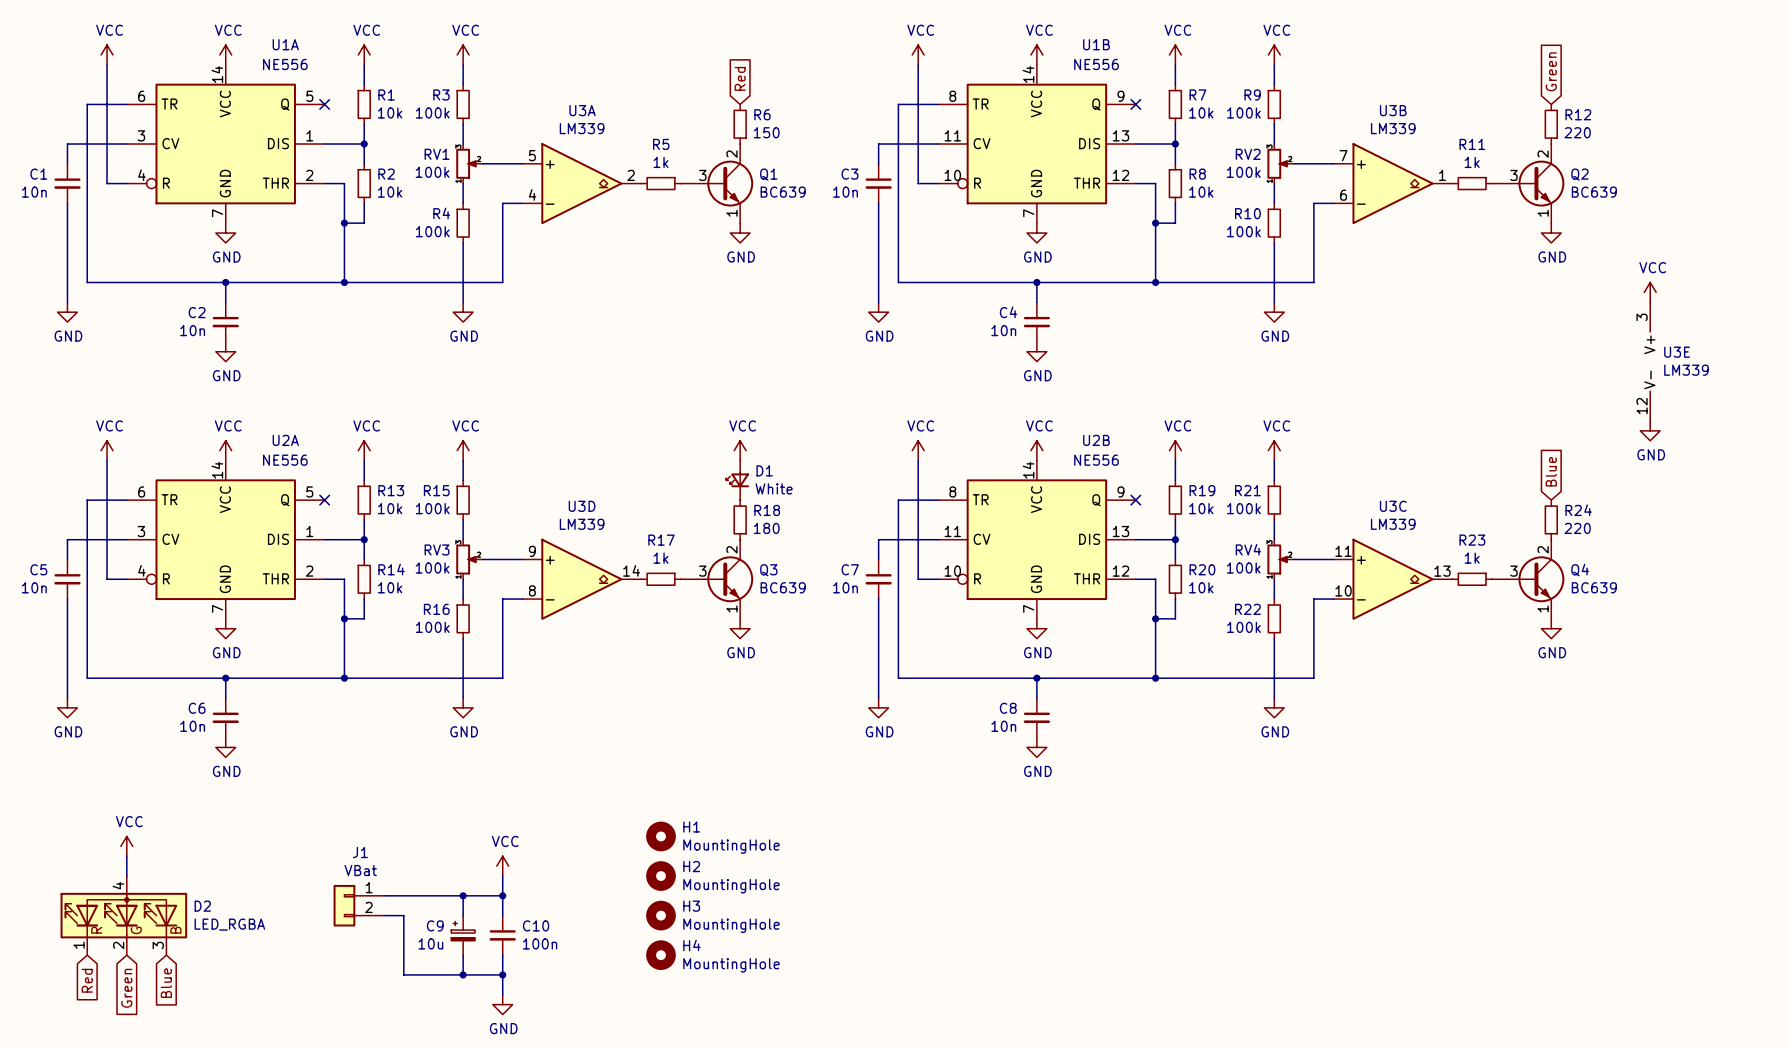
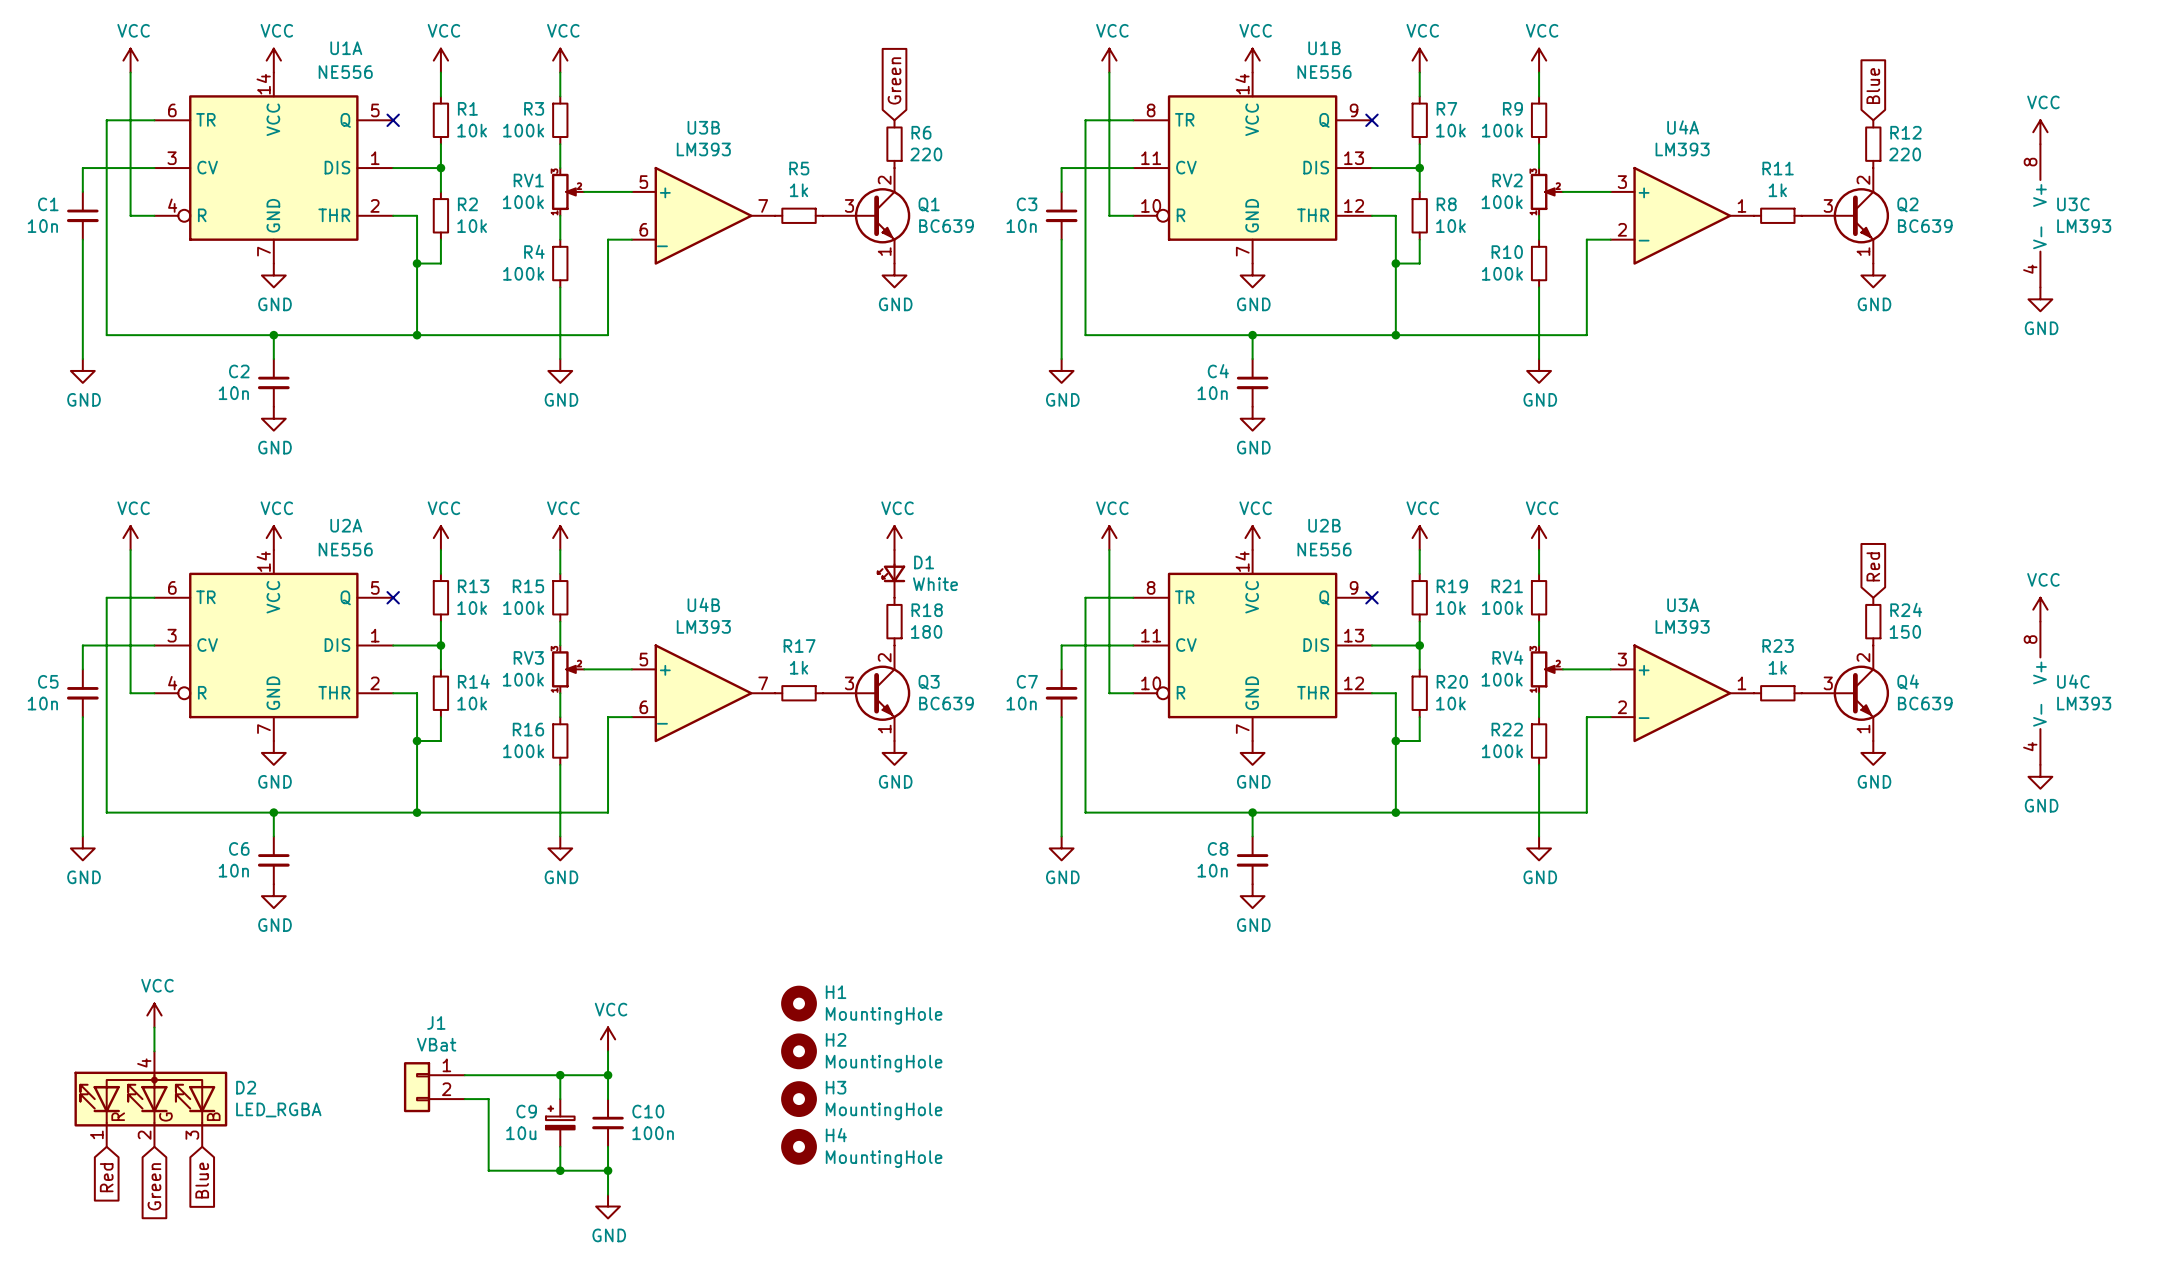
global label: Green (1551, 71) -> Blue (1873, 86)
global label: Red (740, 78) -> Green (894, 80)
power symbol: none -> VCC (2040, 132)
U3A value: LM339 (582, 128) -> LM393 (1682, 626)
U3B value: LM339 (1393, 128) -> LM393 (703, 149)
R6 value: 150 (766, 132) -> 220 (926, 154)
U3A symbol: [522, 143, 642, 225] -> [1610, 644, 1754, 743]
U3B symbol: [1333, 143, 1453, 225] -> [631, 166, 776, 265]
U4A: none -> LM393 (1682, 215)
power symbol: none -> GND (2040, 299)
power symbol: VCC (1650, 292) -> none
U3E: LM339 (1650, 361) -> none
power symbol: GND (1650, 430) -> none
global label: Blue (1551, 471) -> Red (1873, 566)
U3C name position: U3C (1393, 506) -> U3C (2073, 204)
power symbol: none -> VCC (2040, 609)
U3C value: LM339 (1393, 524) -> LM393 (2084, 226)
R24 value: 220 (1577, 528) -> 150 (1905, 631)
U3C symbol: [1333, 538, 1453, 620] -> [2040, 144, 2041, 288]
U3D: LM339 (581, 579) -> none
U4B: none -> LM393 (703, 693)
U4C: none -> LM393 (2040, 693)
power symbol: none -> GND (2040, 776)

